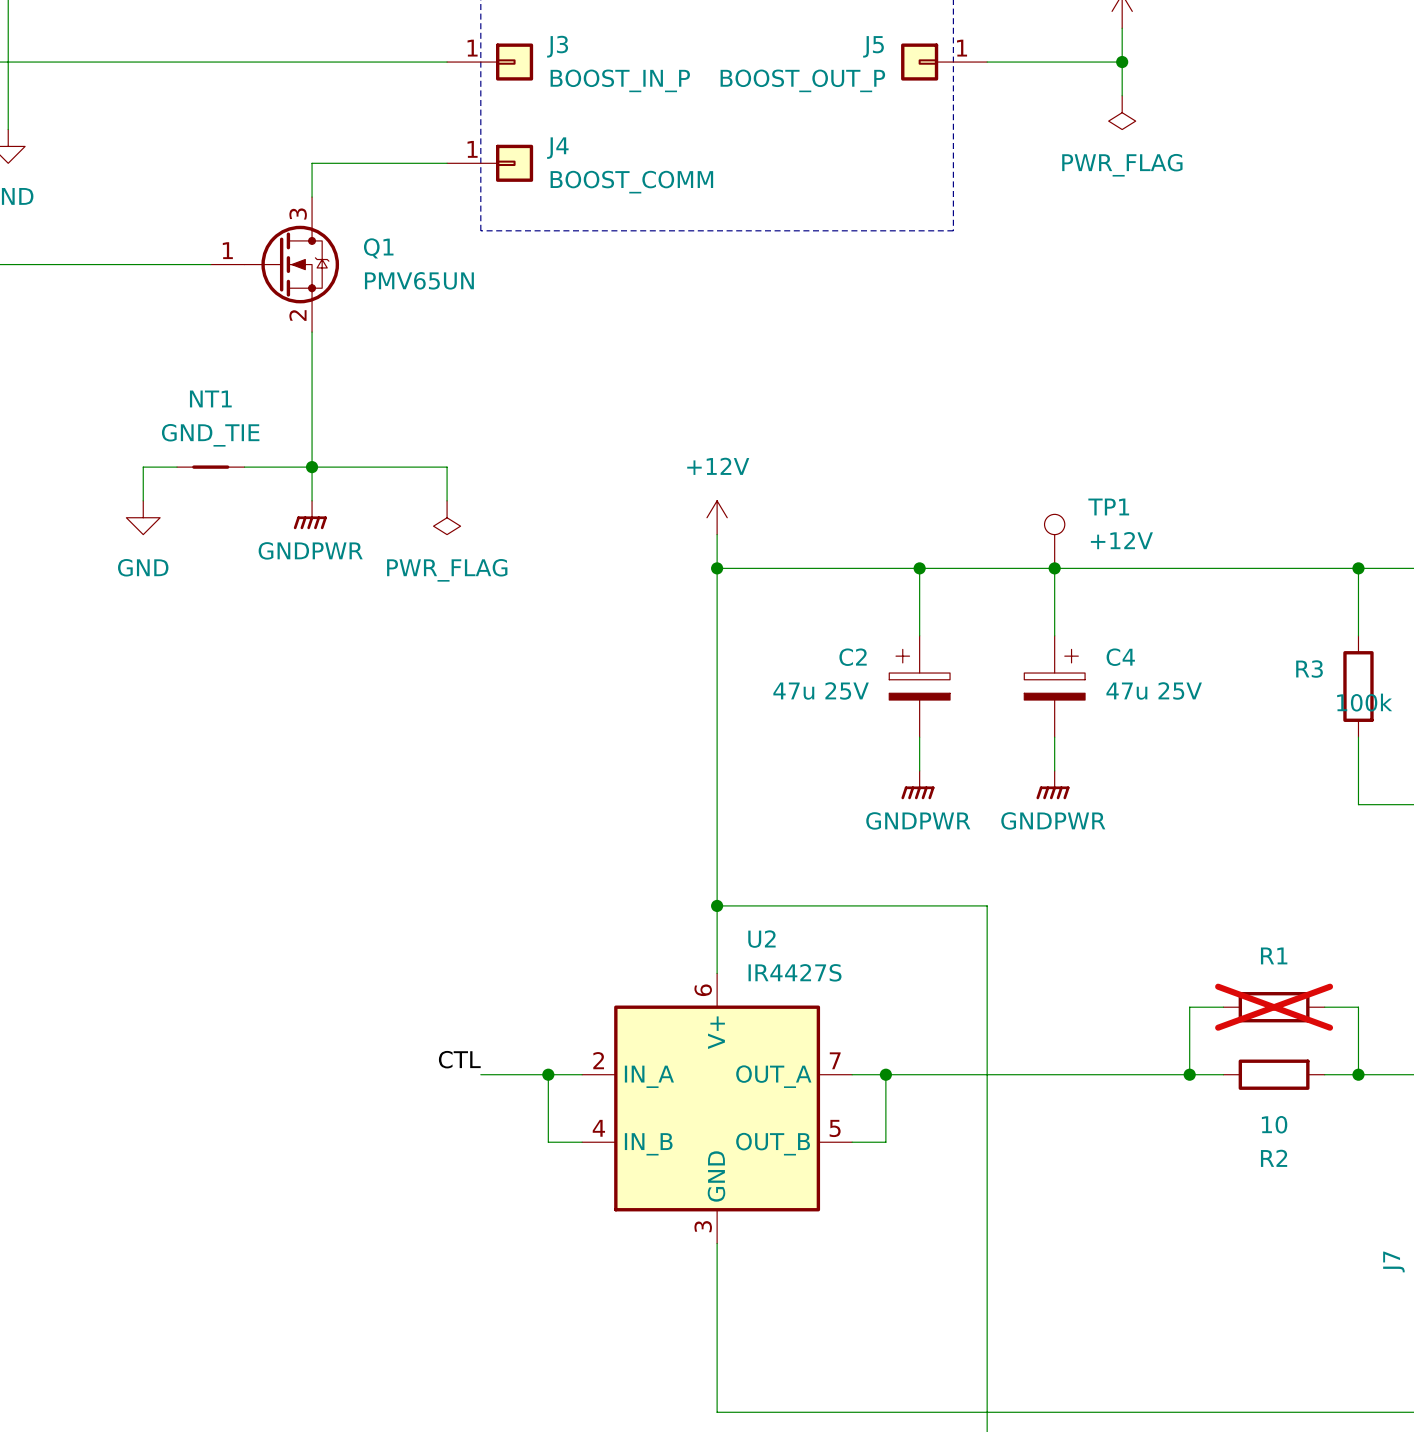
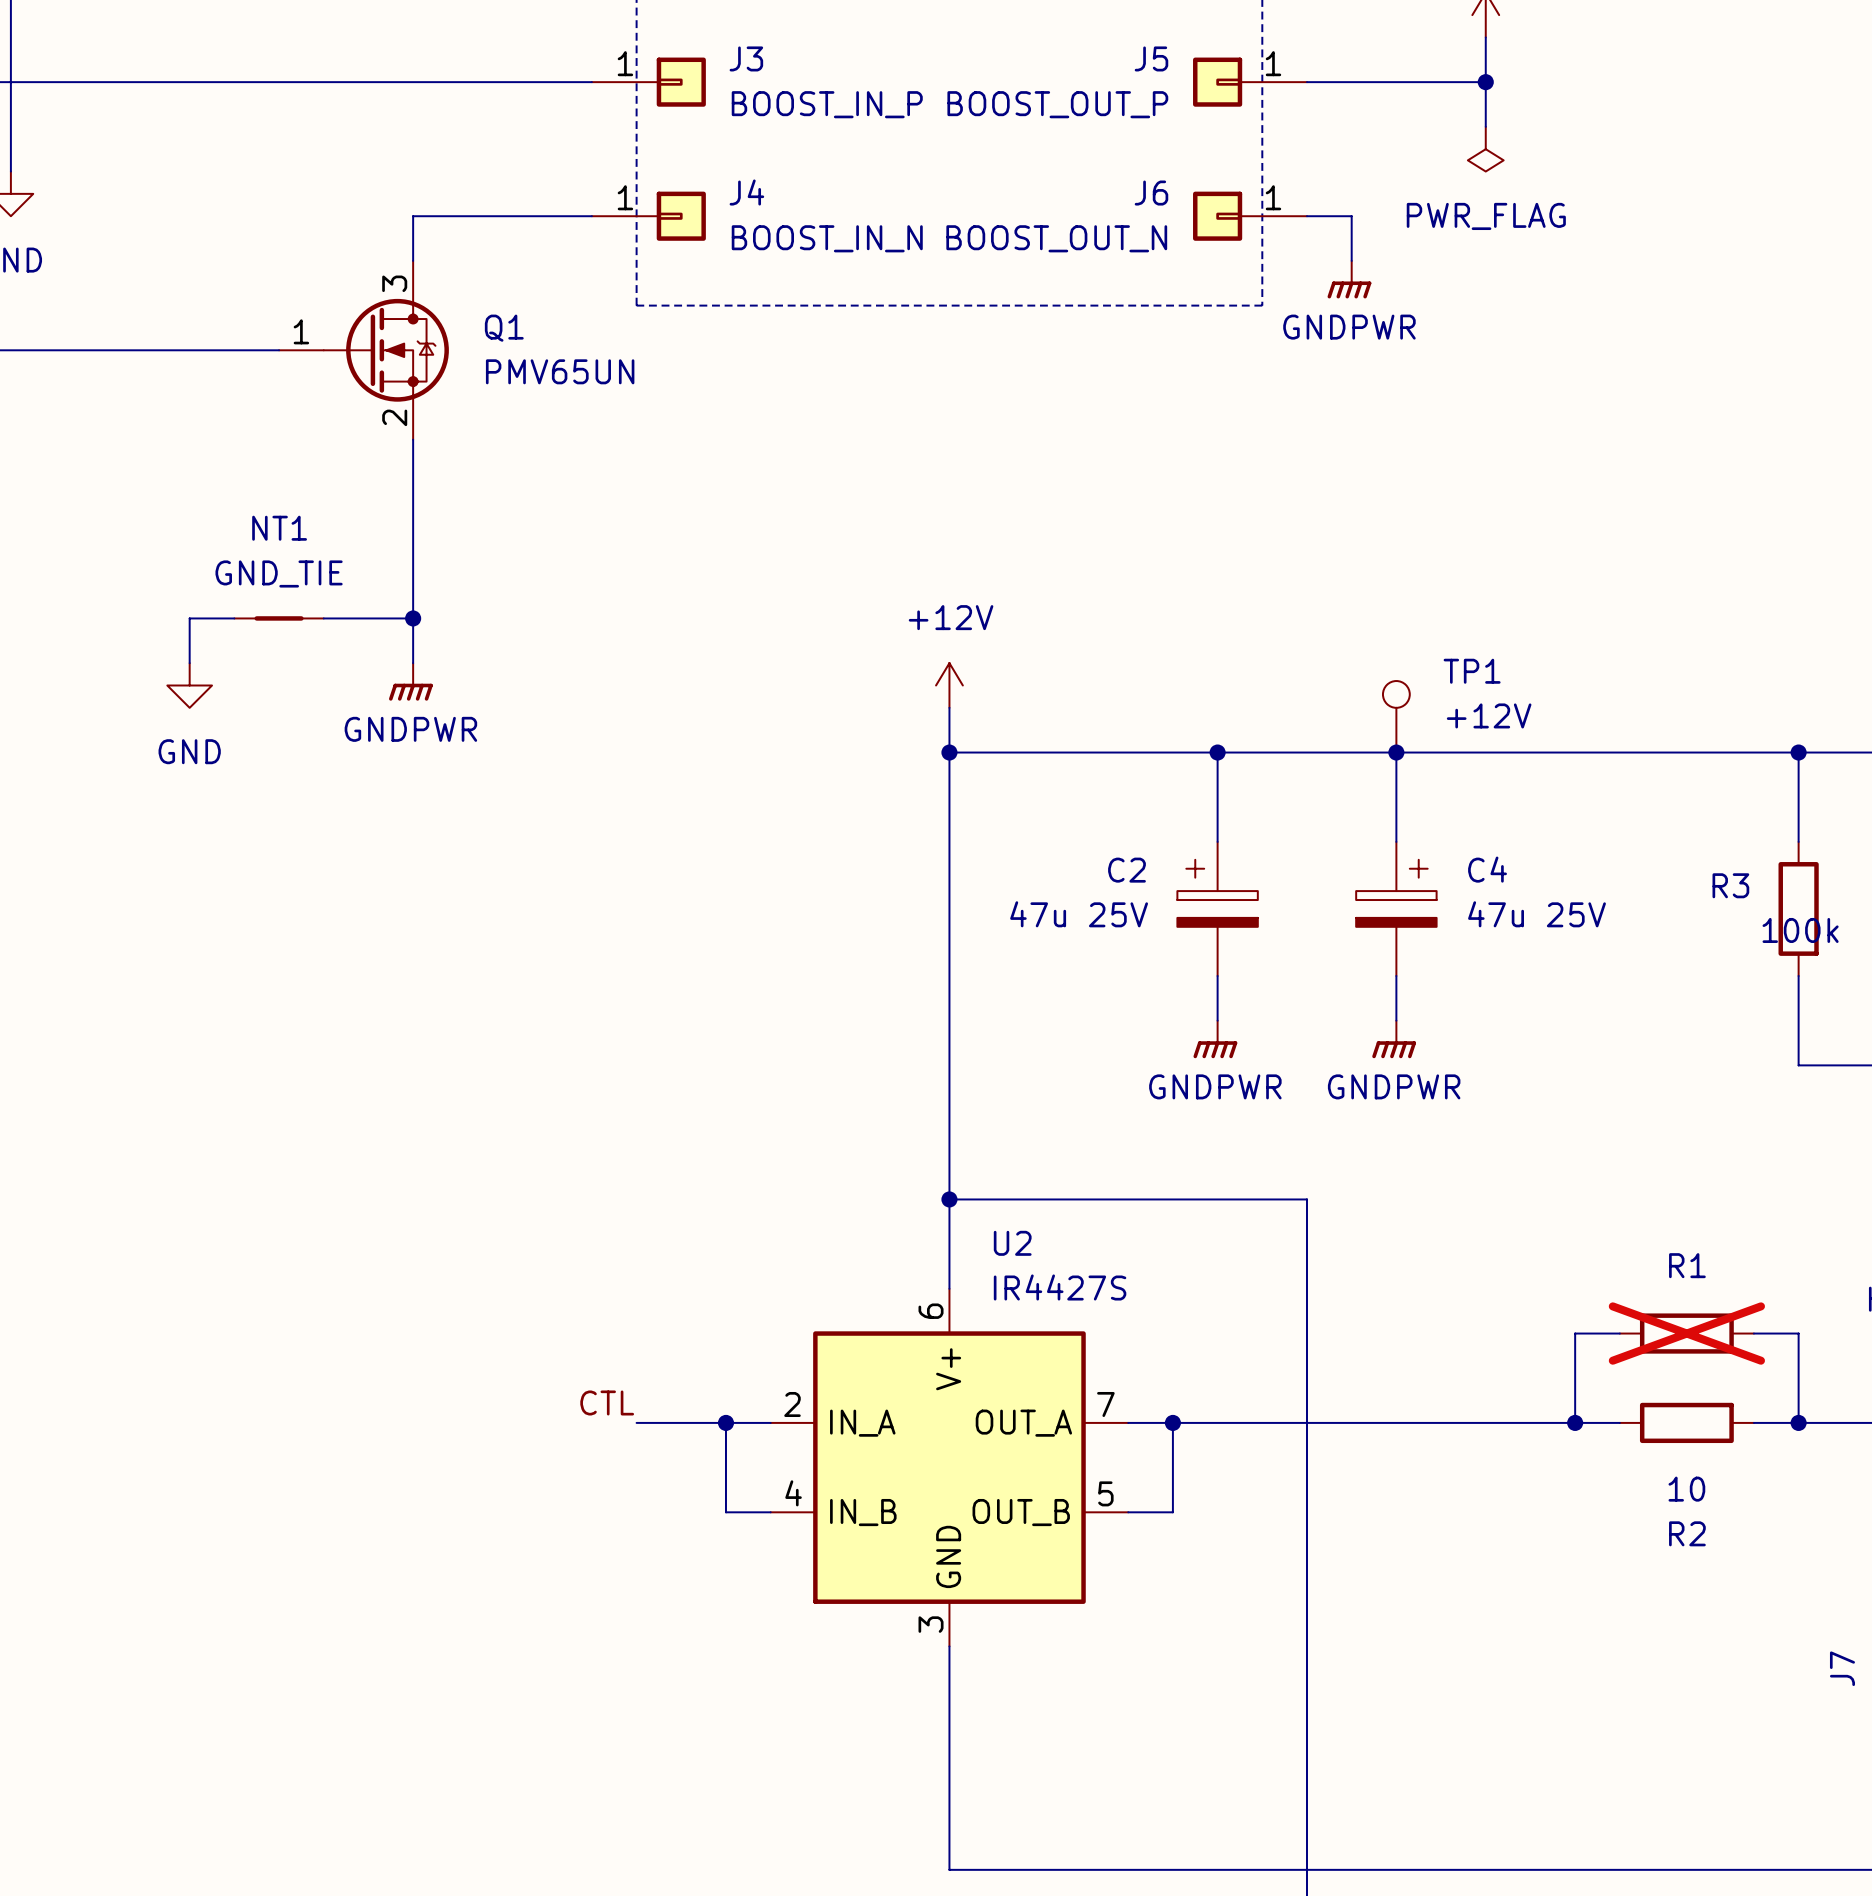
J6: none -> BOOST_OUT_N (1250, 216)
wire: none -> (1306, 216) (1351, 216) (1351, 260)
J4 value: BOOST_COMM (631, 182) -> BOOST_IN_N (827, 238)
power symbol: none -> GNDPWR (1349, 279)
wire: (312, 467) (447, 467) (447, 500) -> none
power symbol: PWR_FLAG (447, 517) -> none

